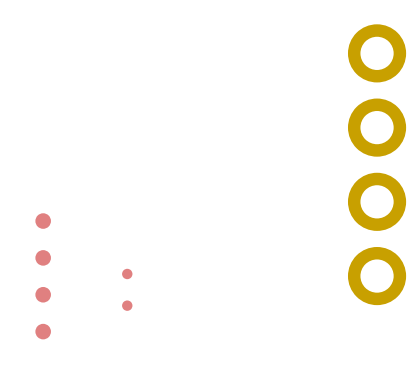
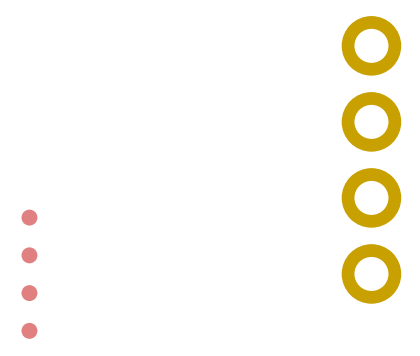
part: (127, 273) -> none
part: (127, 305) -> none

